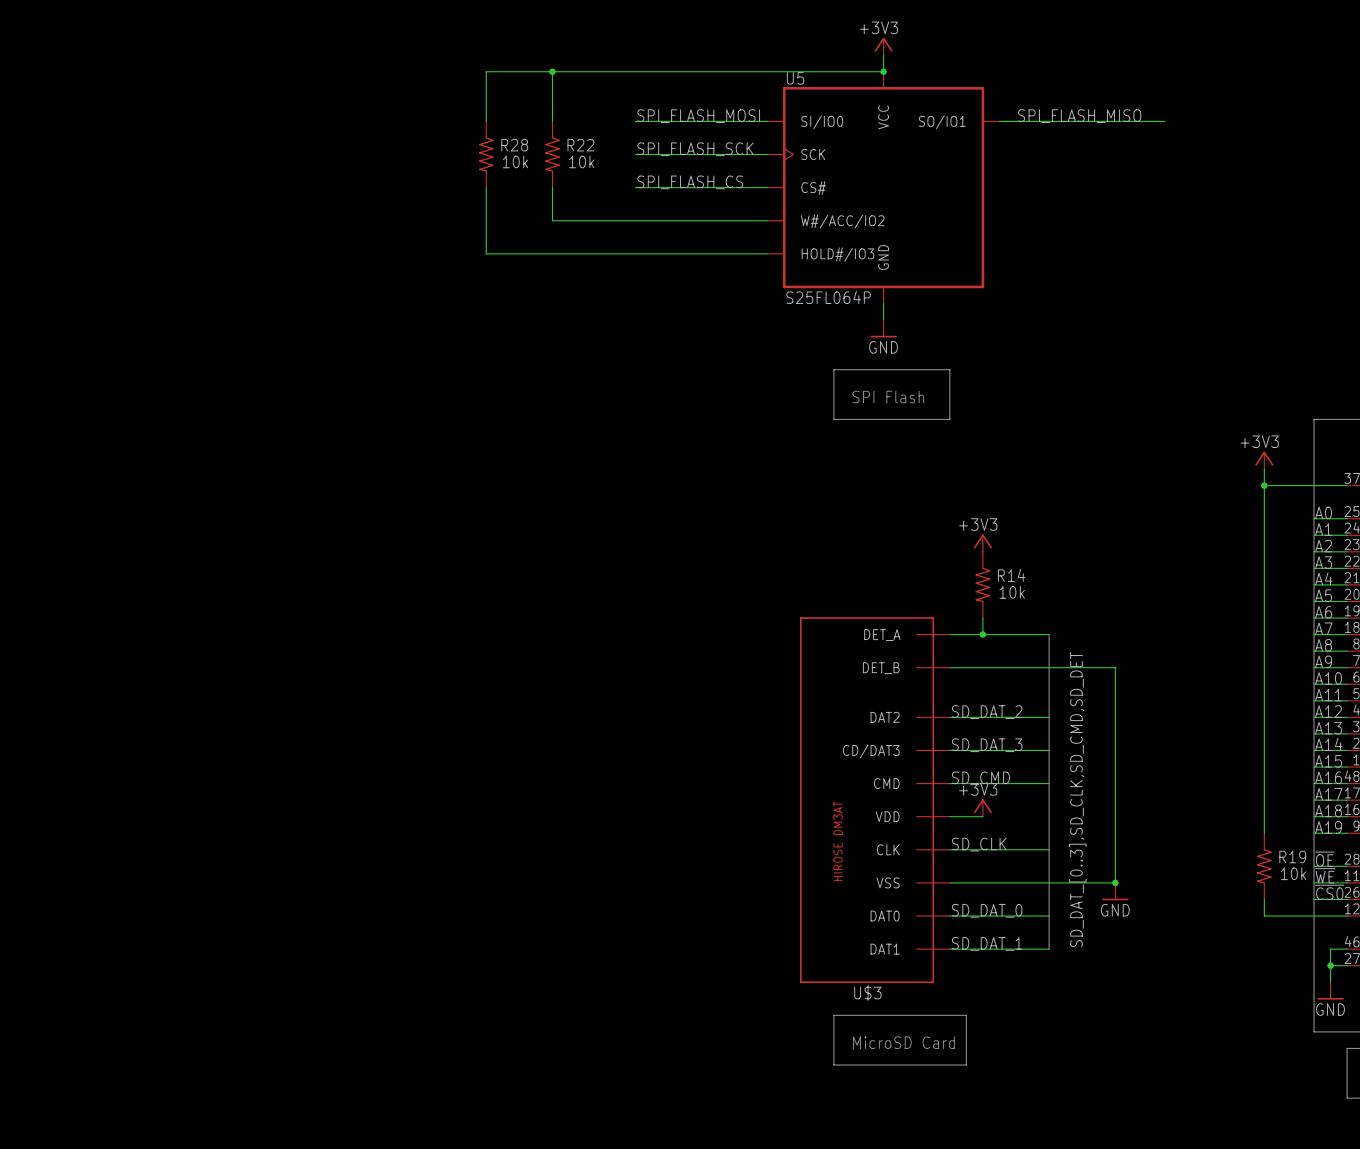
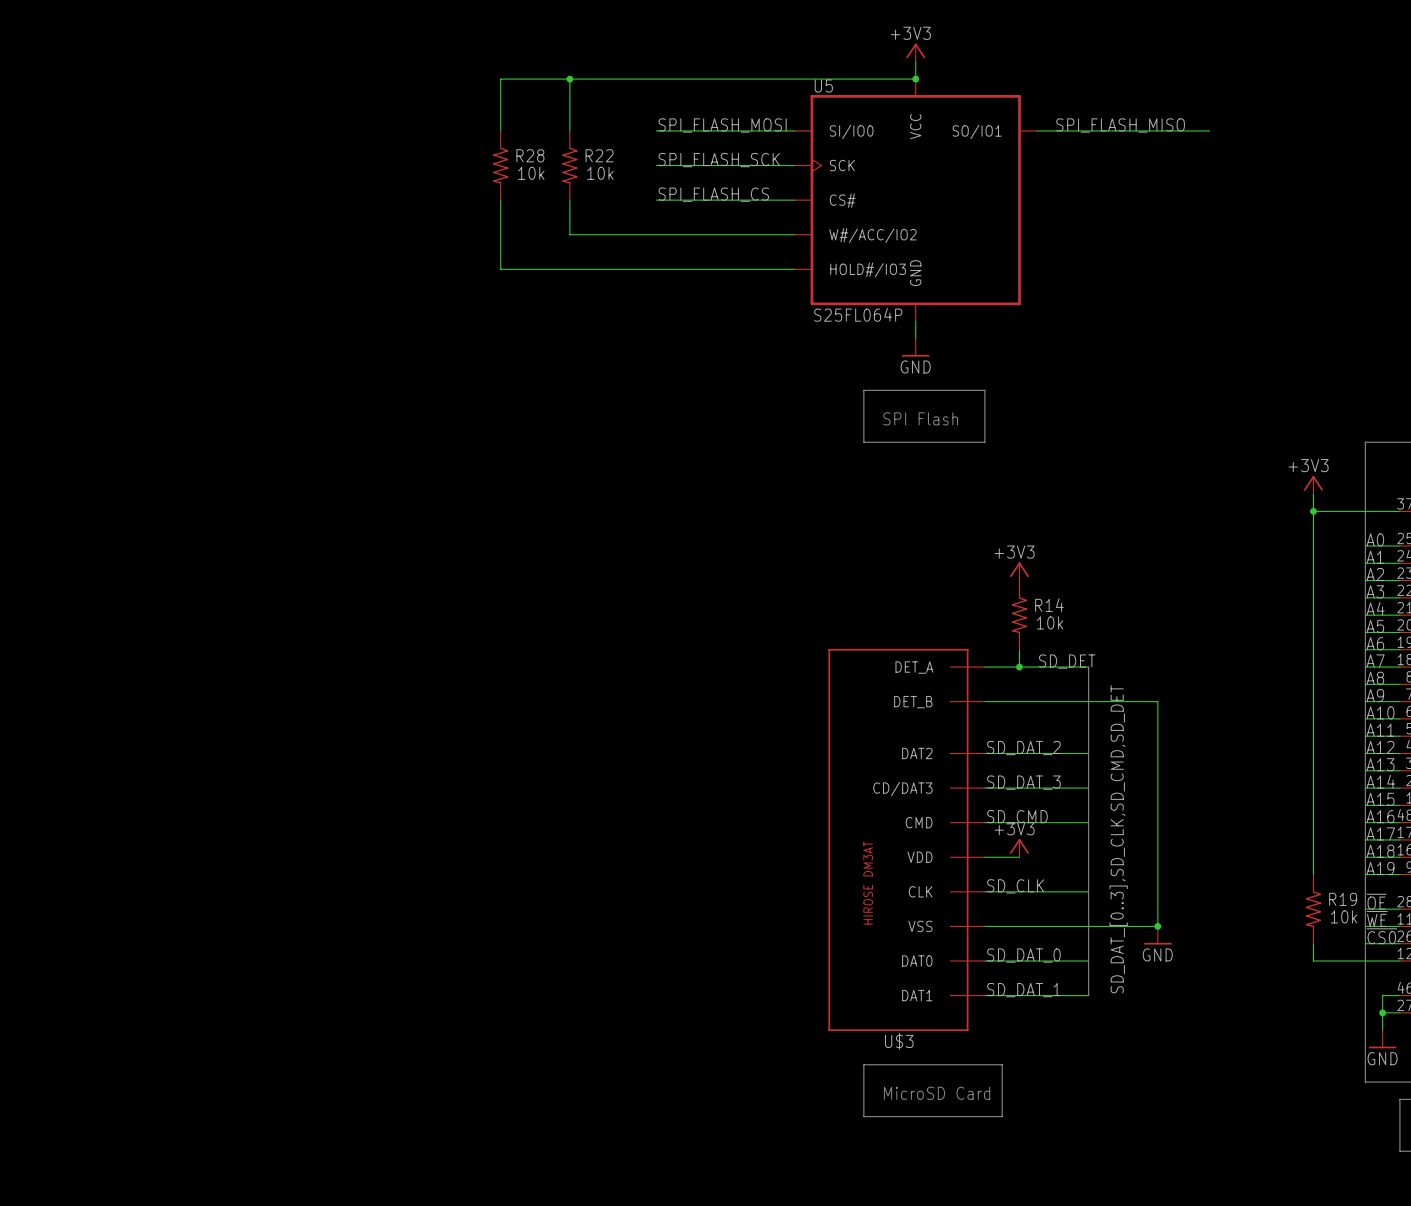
label: none -> SD_DET (1067, 661)

